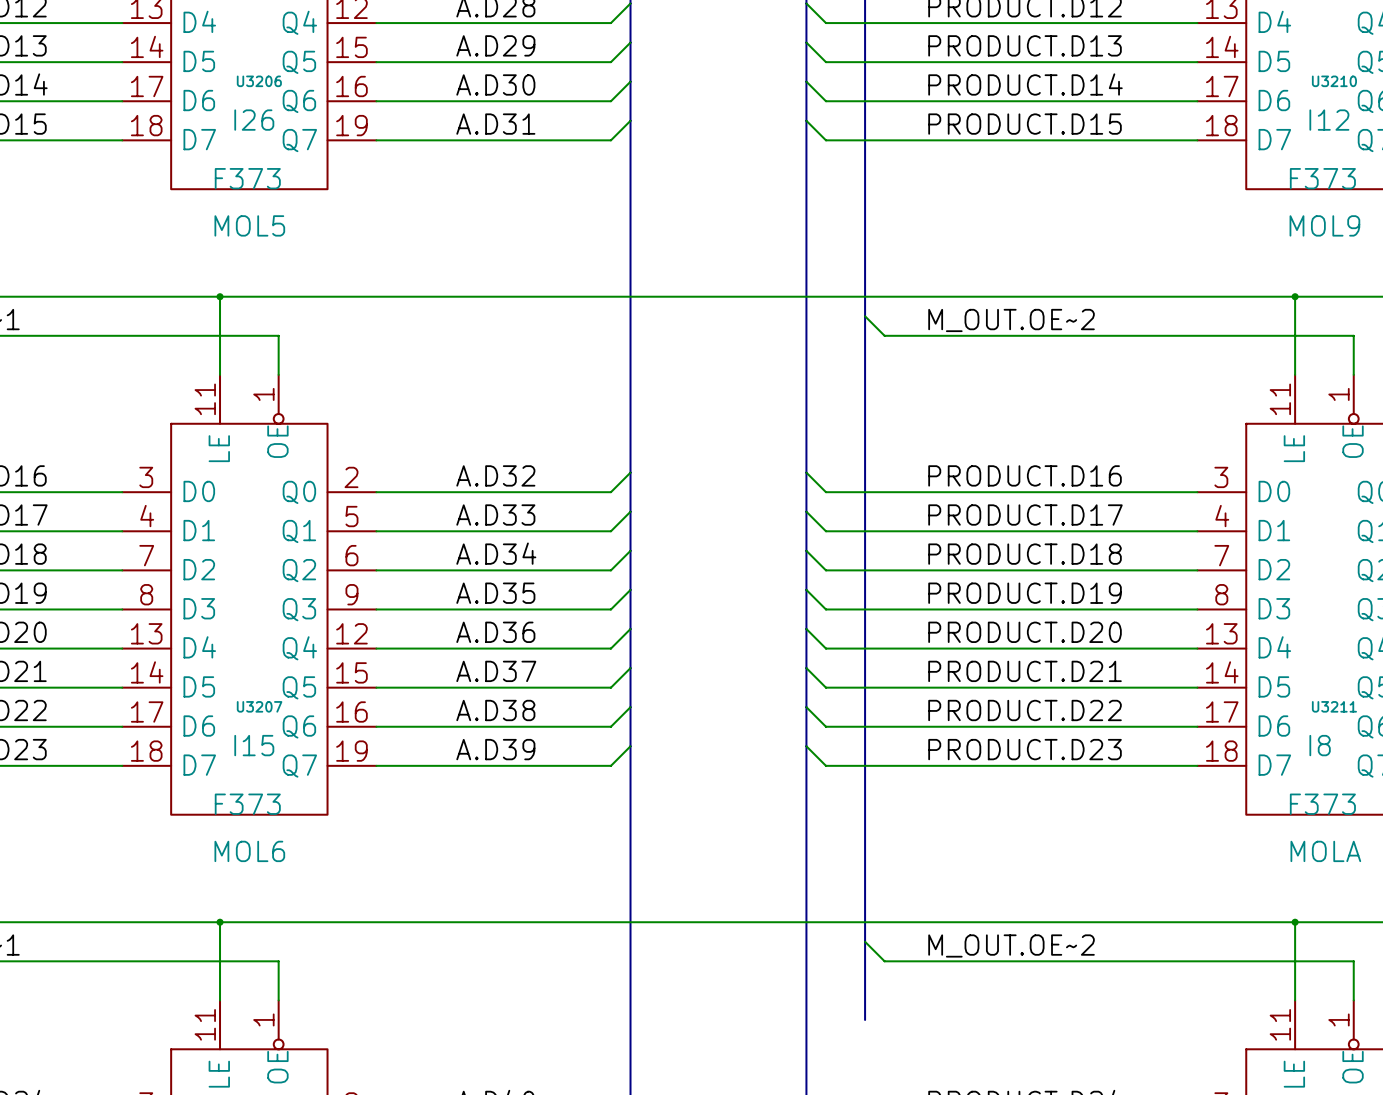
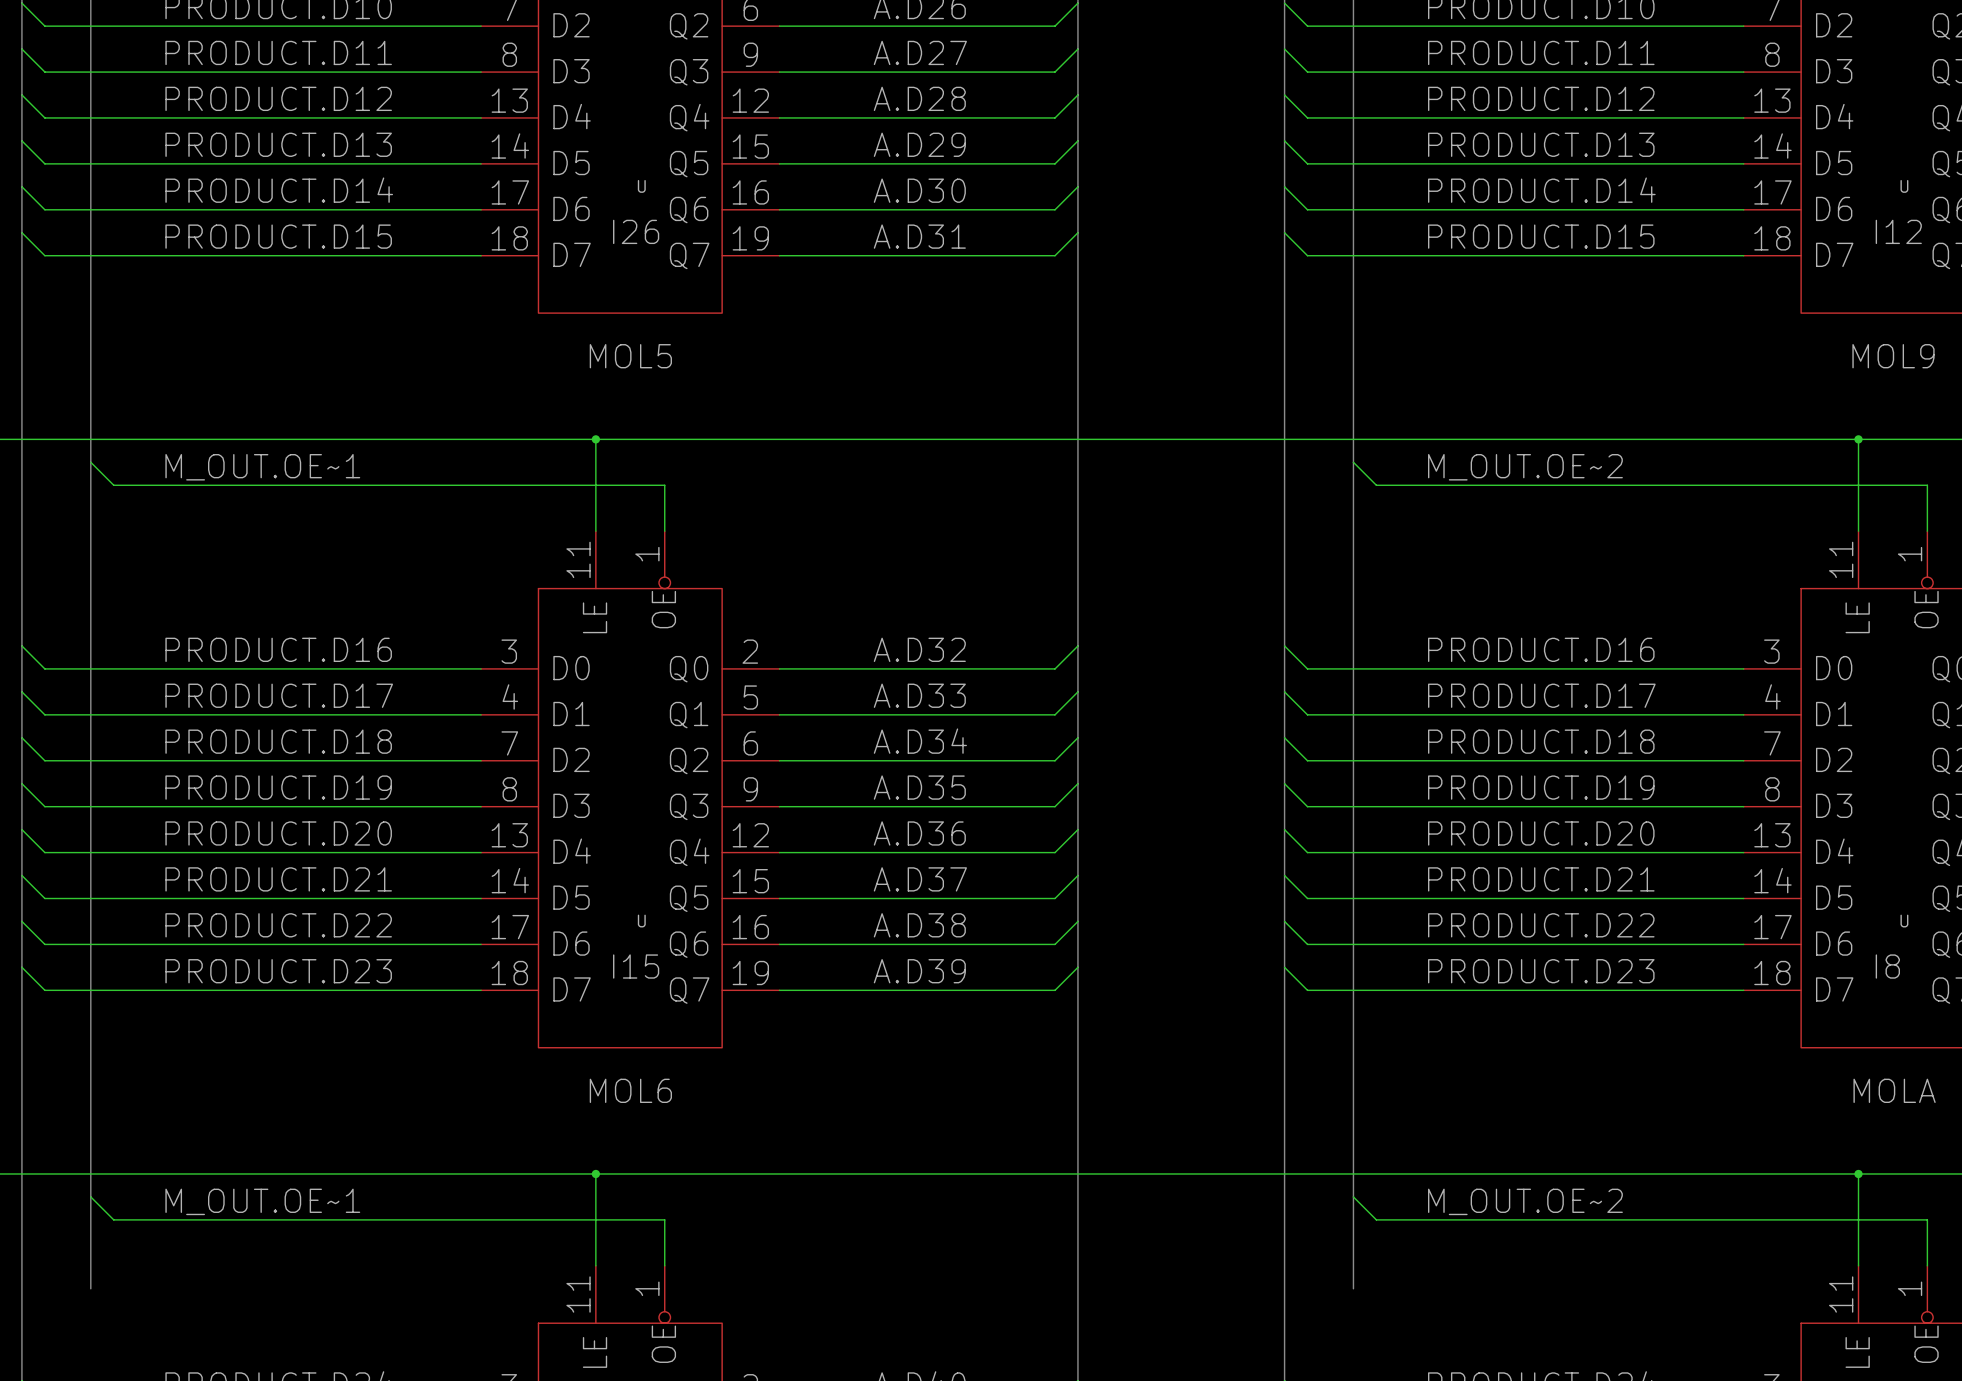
U3206 name: U3206 (259, 81) -> U (641, 186)
U3210 name: U3210 (1334, 81) -> U (1904, 186)
U3206 value: F373 (247, 178) -> none
U3210 value: F373 (1322, 178) -> none
U3207 name: U3207 (259, 706) -> U (641, 921)
U3211 name: U3211 (1334, 706) -> U (1904, 921)
U3207 value: F373 (247, 804) -> none
U3211 value: F373 (1322, 804) -> none

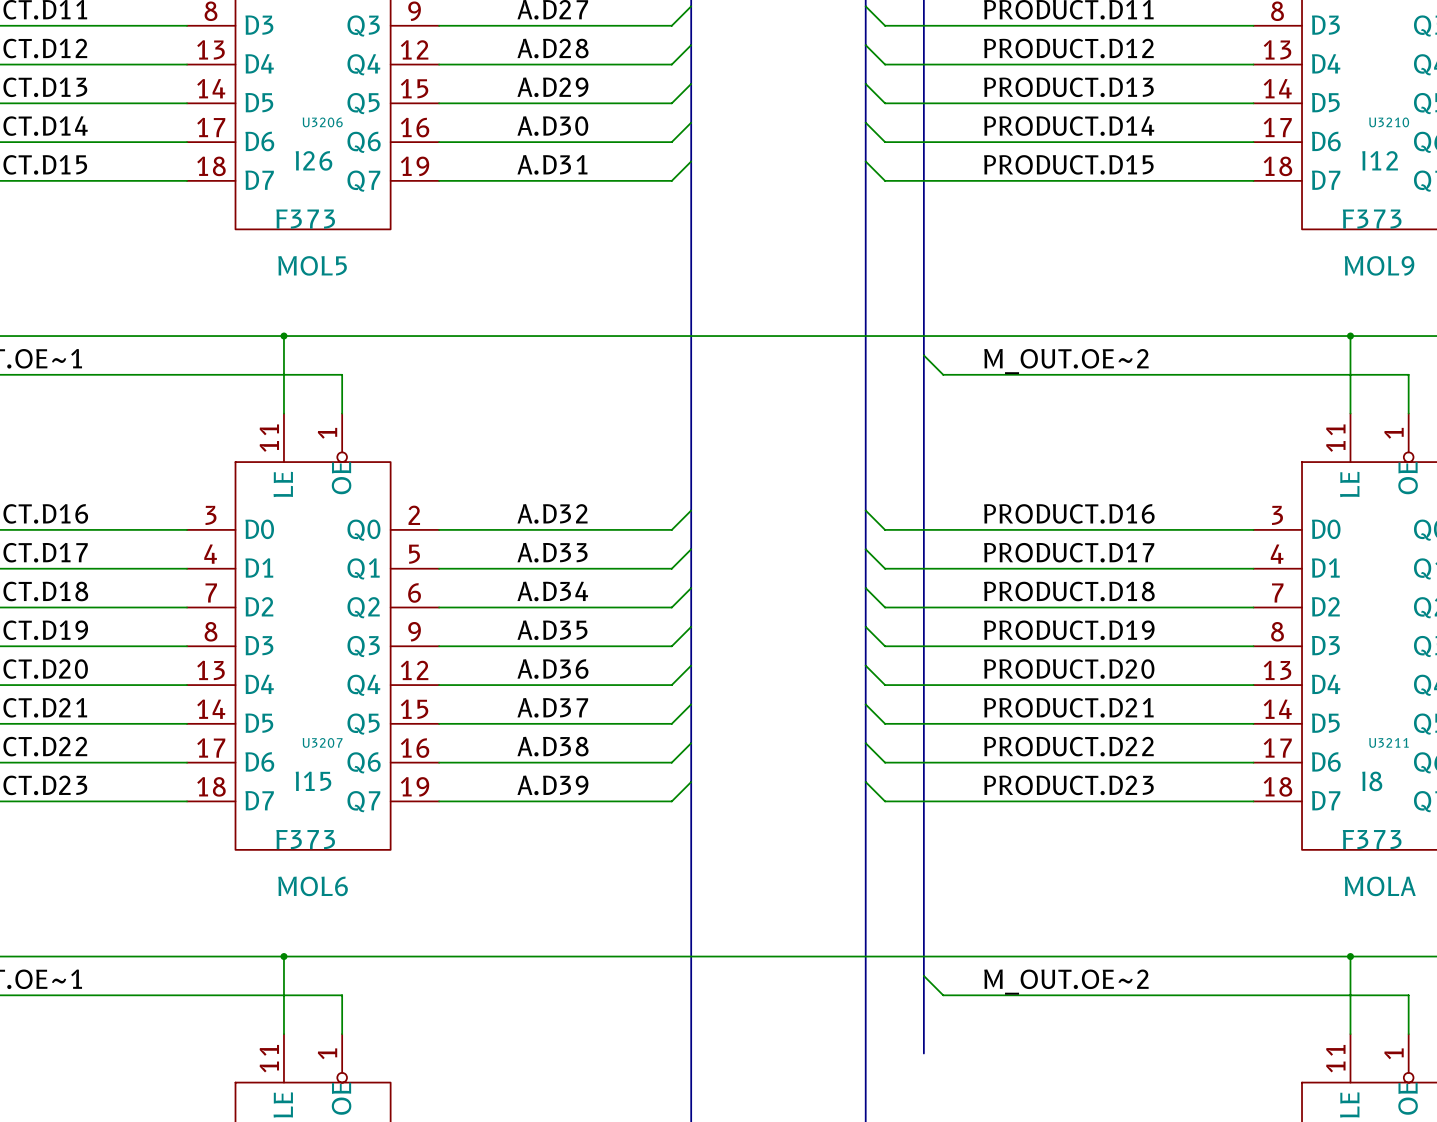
U name: U (641, 186) -> U3206 (322, 122)
U name: U (1904, 186) -> U3210 (1389, 122)
U value: none -> F373 (305, 219)
U value: none -> F373 (1372, 219)
U name: U (641, 921) -> U3207 (322, 742)
U name: U (1904, 921) -> U3211 (1388, 742)
U value: none -> F373 (305, 839)
U value: none -> F373 (1372, 839)

